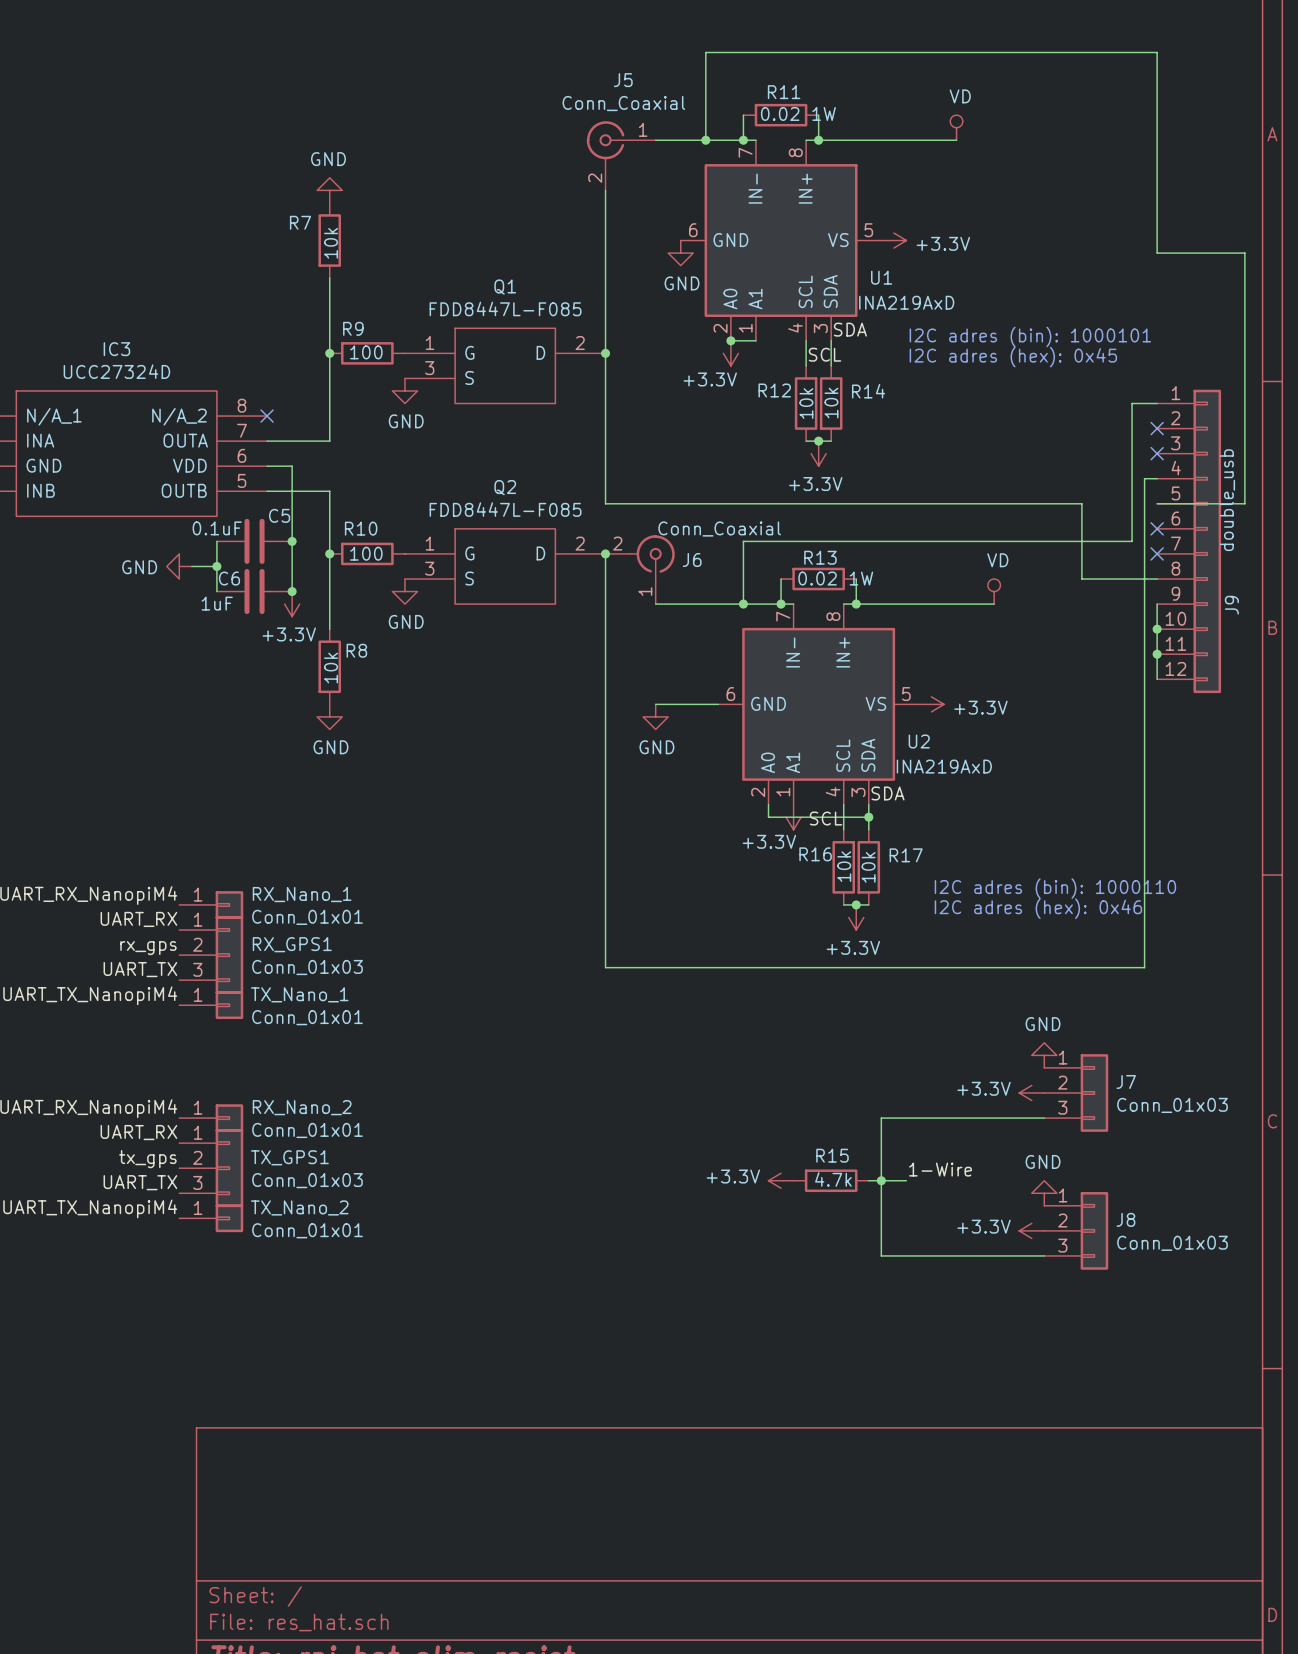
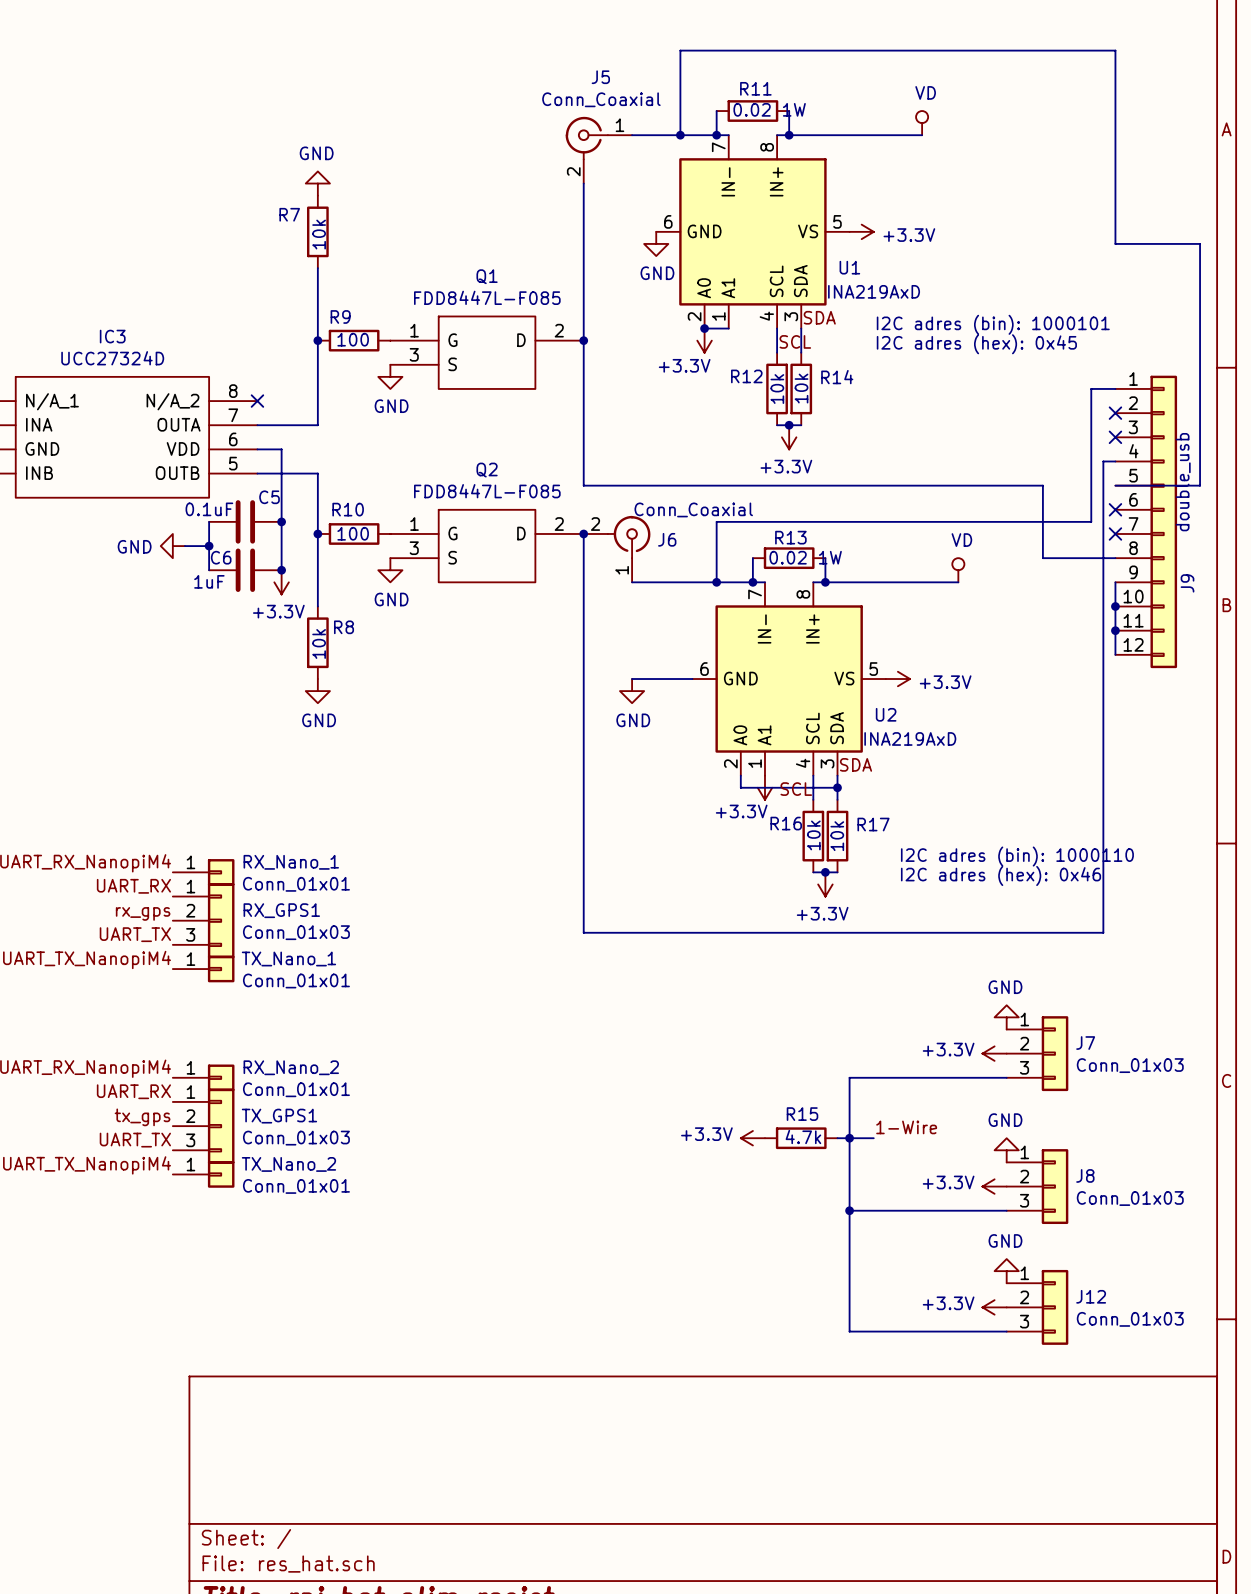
wire: none -> (849, 1210) (849, 1331) (1006, 1331)
junction: none -> (849, 1210)
power symbol: none -> GND (1006, 1271)
power symbol: none -> +3.3V (994, 1307)
J12: none -> Conn_01x03 (1037, 1307)

